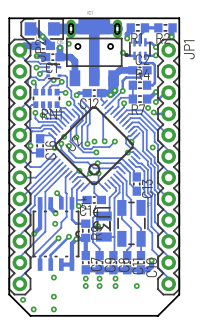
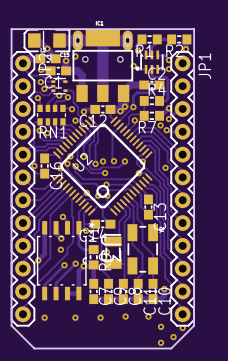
via: (53, 277) -> none
via: (85, 278) -> none
via: (99, 278) -> none
via: (115, 278) -> none
via: (85, 286) -> none
via: (99, 286) -> none
via: none -> (44, 317)
via: none -> (75, 317)
via: none -> (100, 317)
via: none -> (161, 326)
via: (53, 296) -> none
via: none -> (182, 327)
via: (23, 299) -> none
via: none -> (173, 337)
via: (33, 309) -> none
via: (53, 309) -> none
via: none -> (161, 342)

